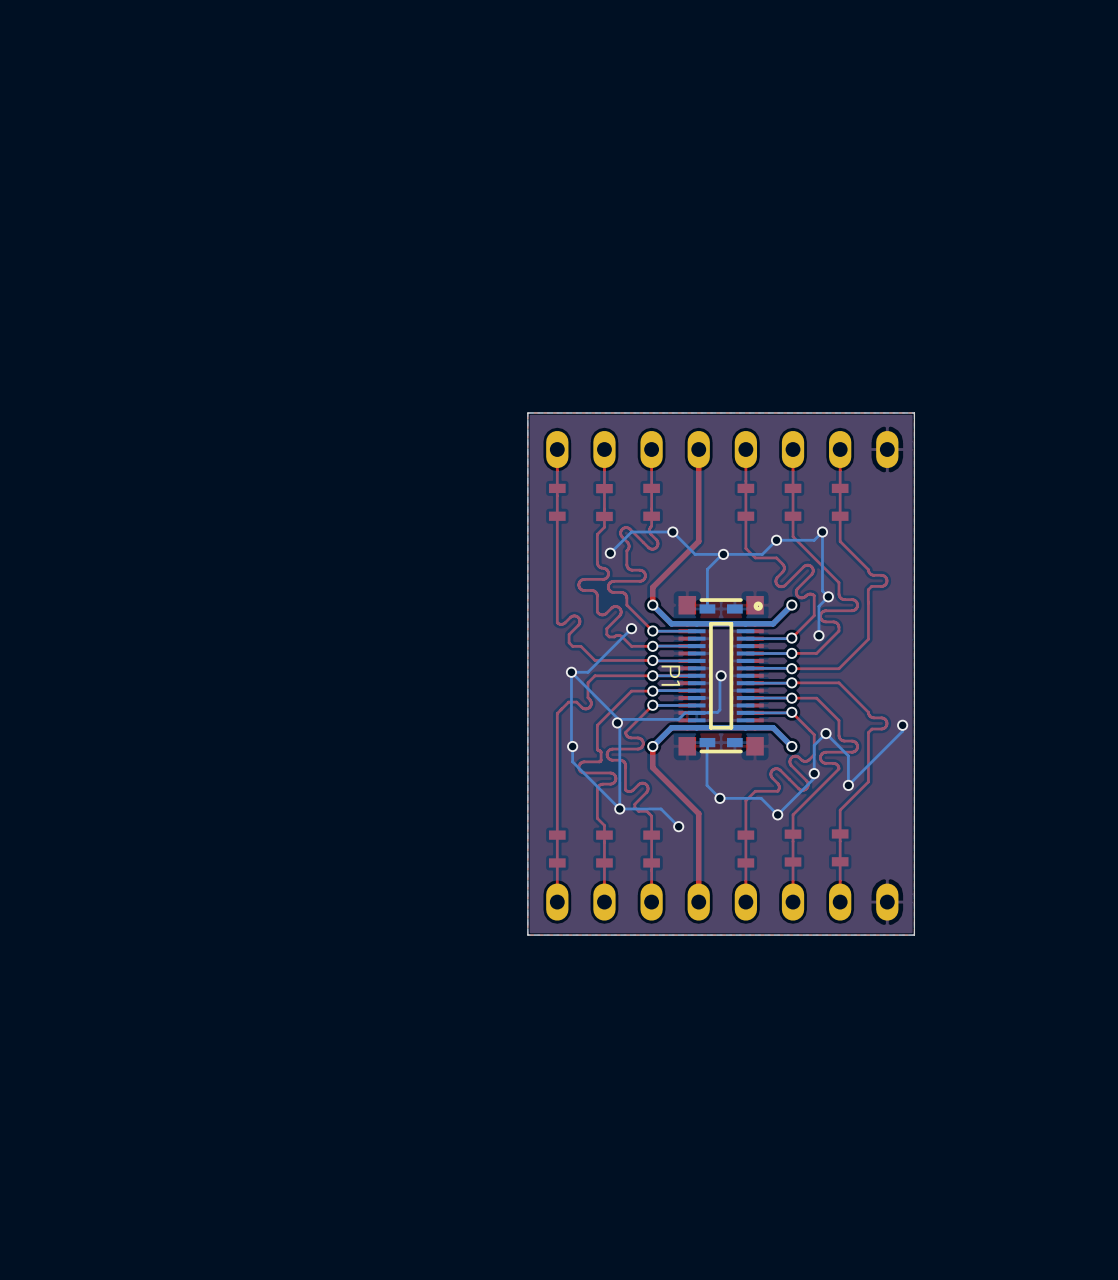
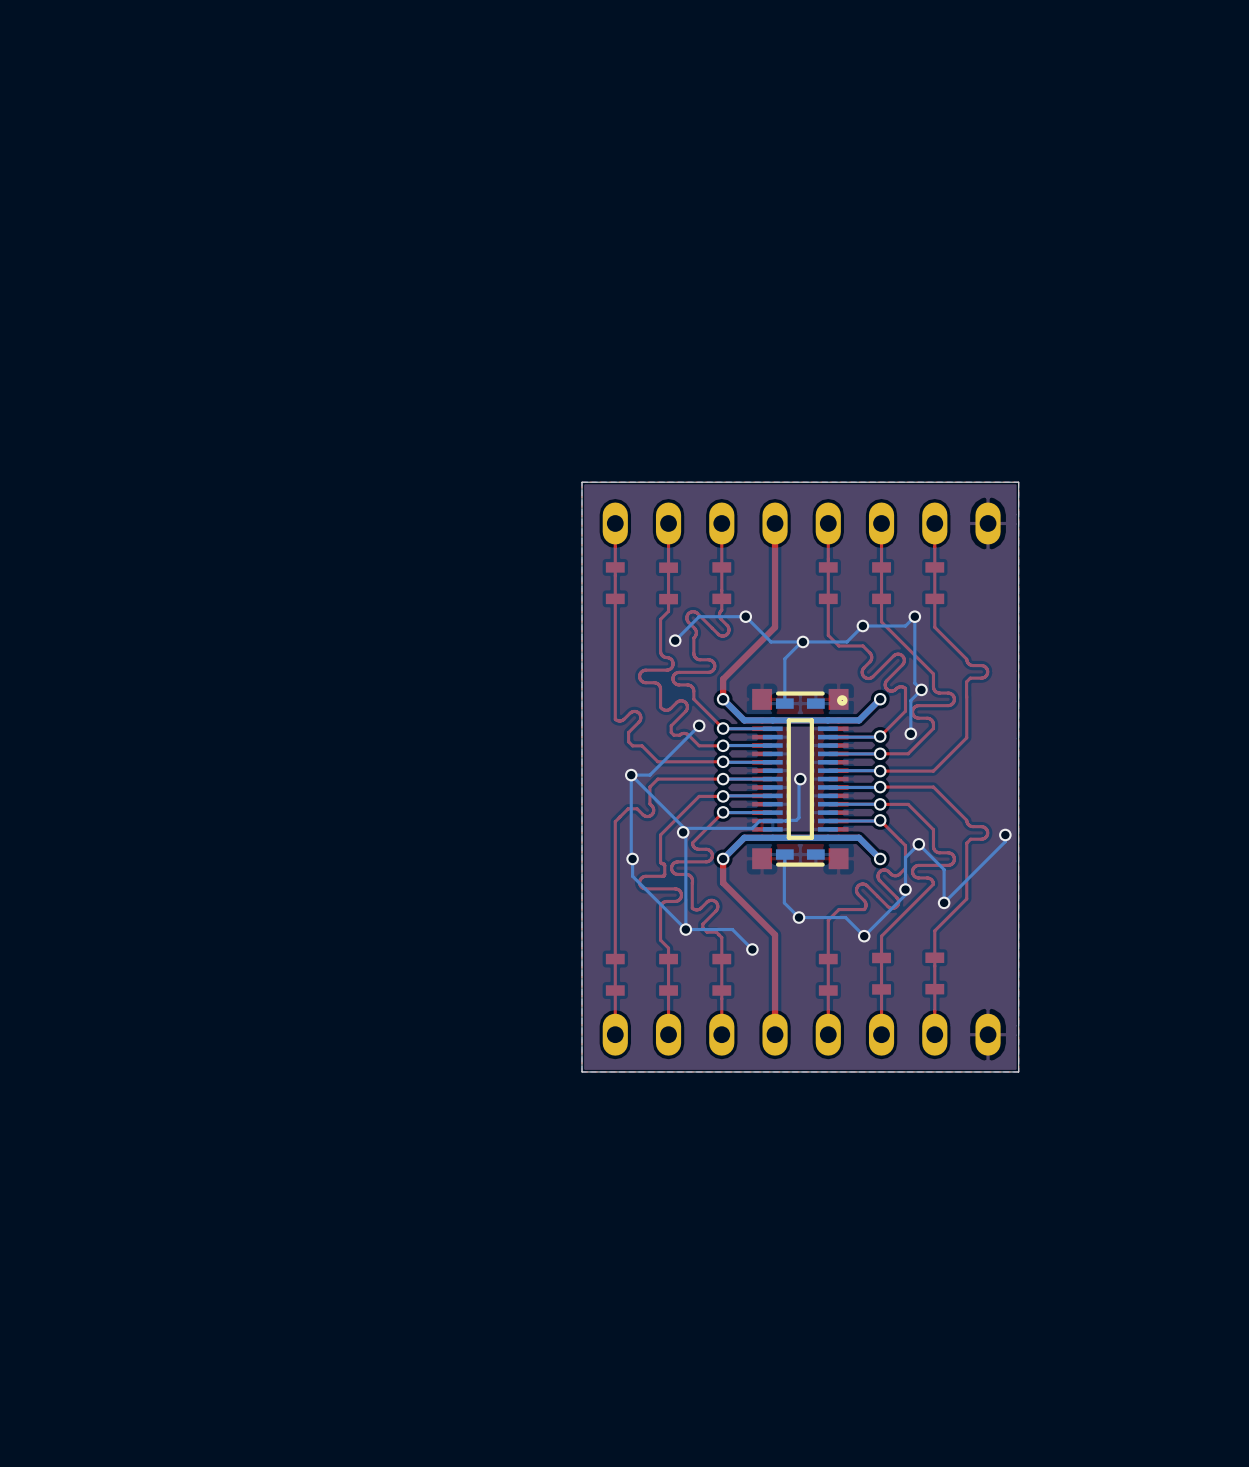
P1 name: P1 (670, 675) -> none

